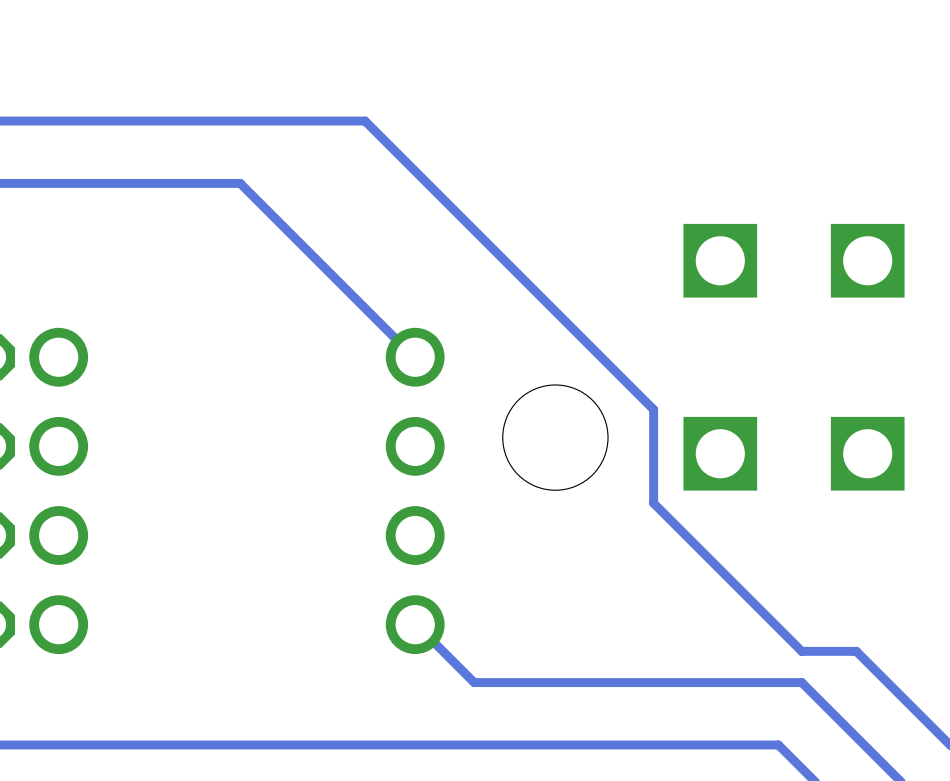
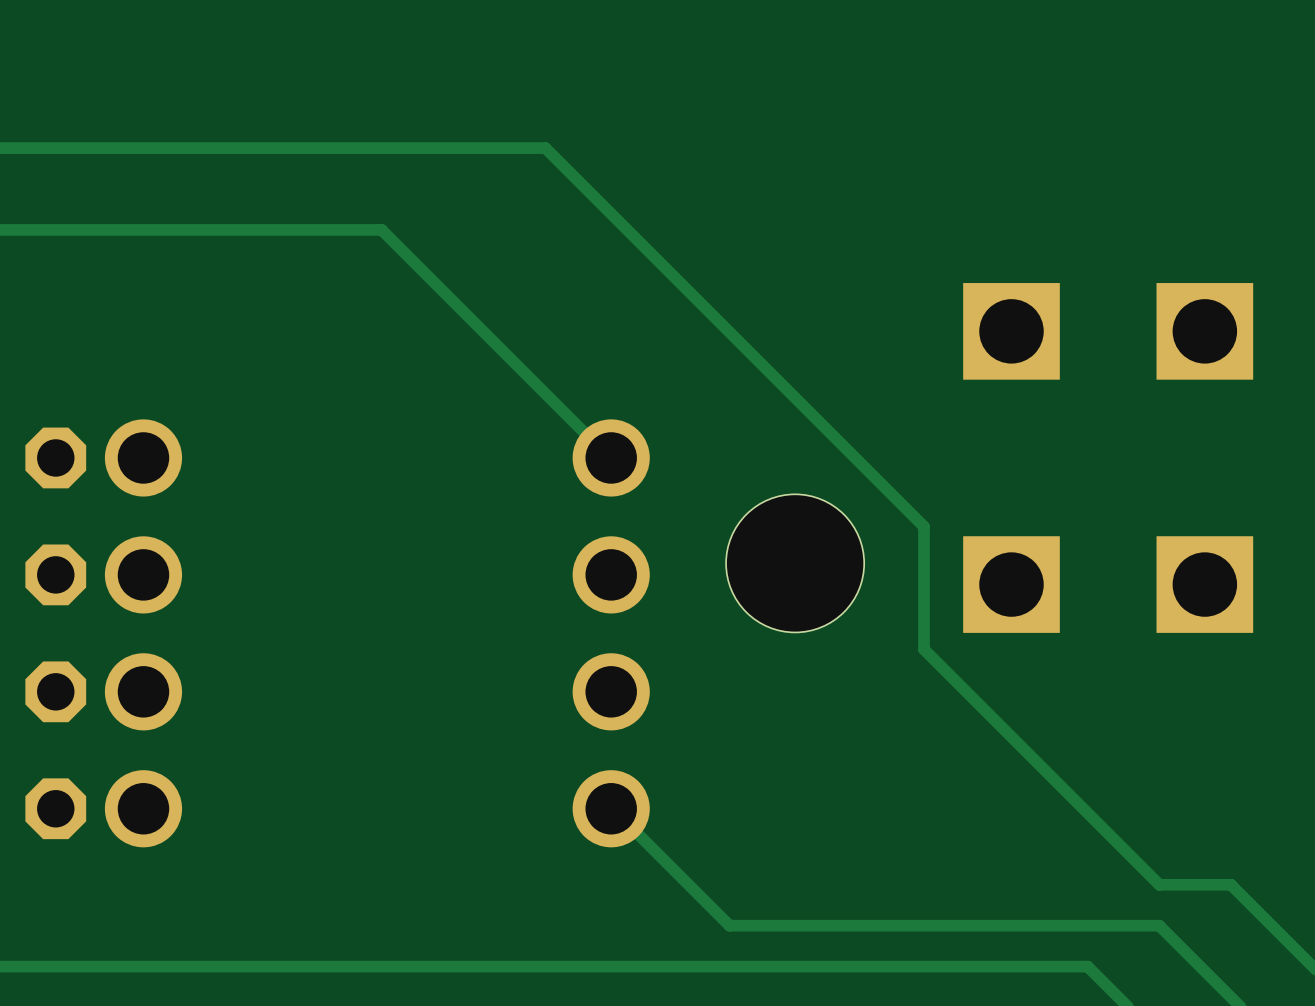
track: (801, 651) (856, 651) (887, 682) -> (1118, 843) (1159, 884) (1230, 884)
track: (474, 682) (801, 682) (833, 713) -> (688, 884) (729, 925) (1159, 925)

